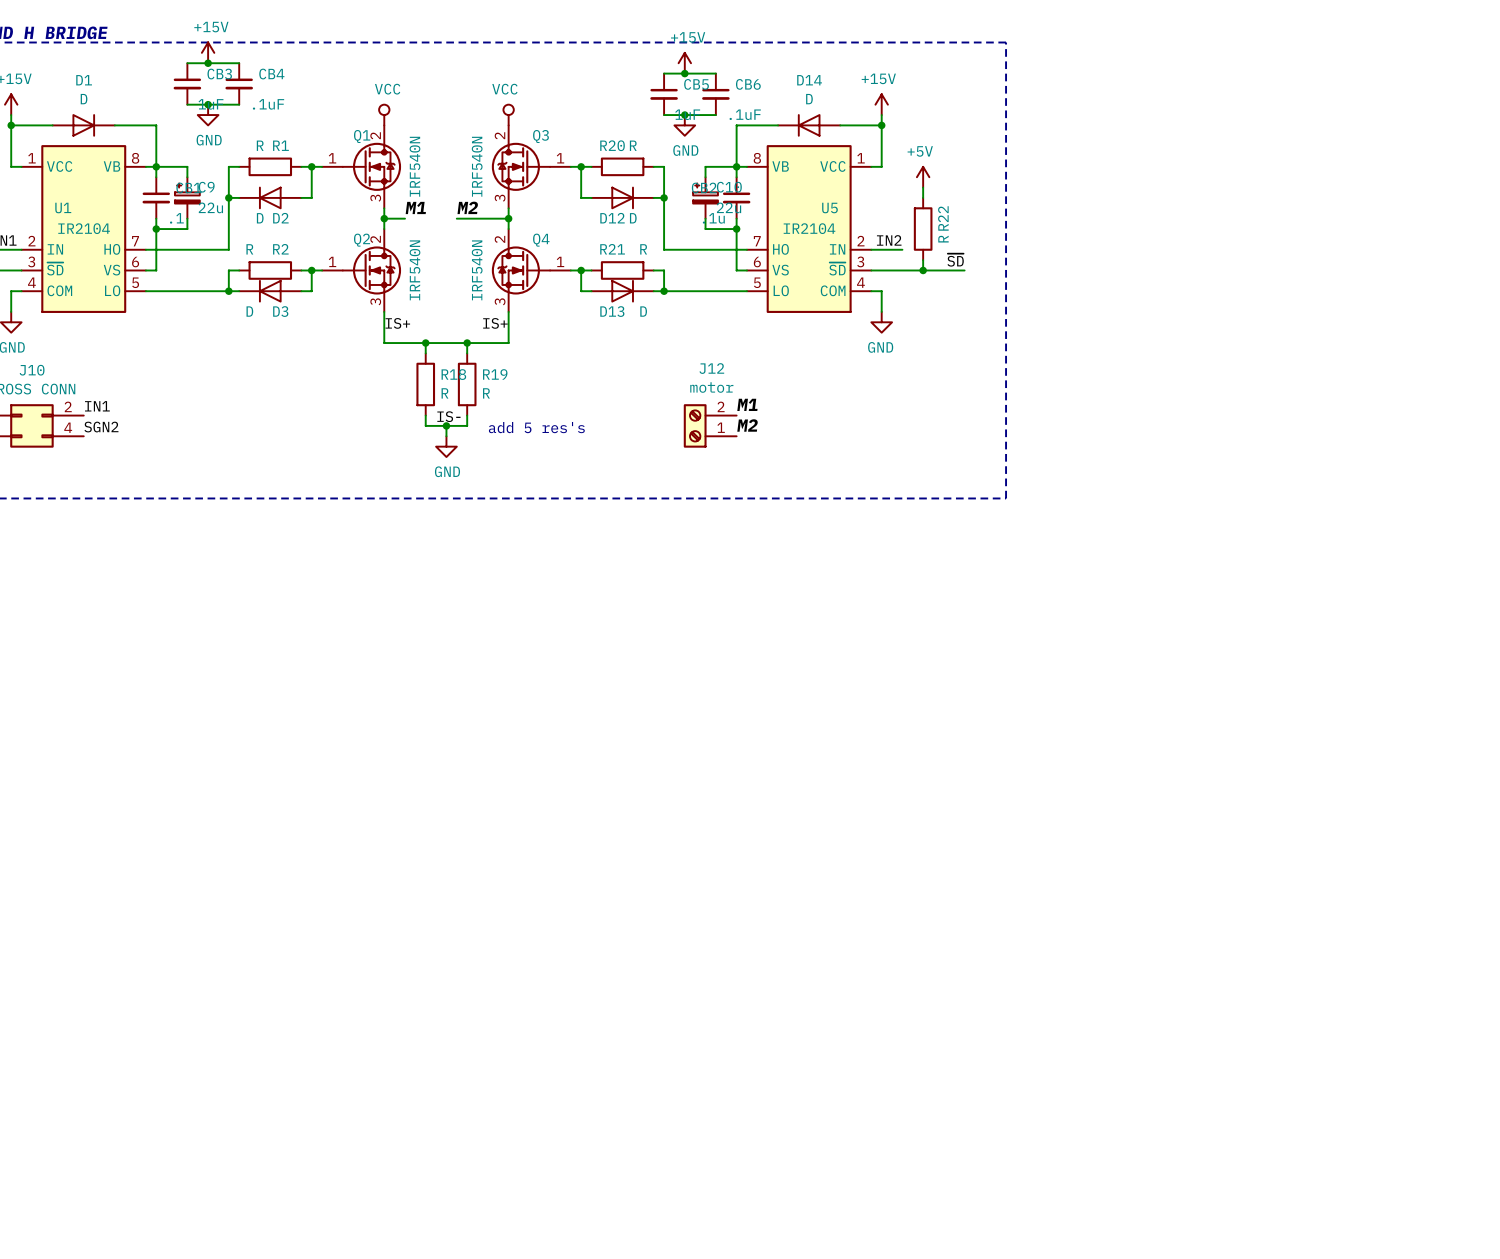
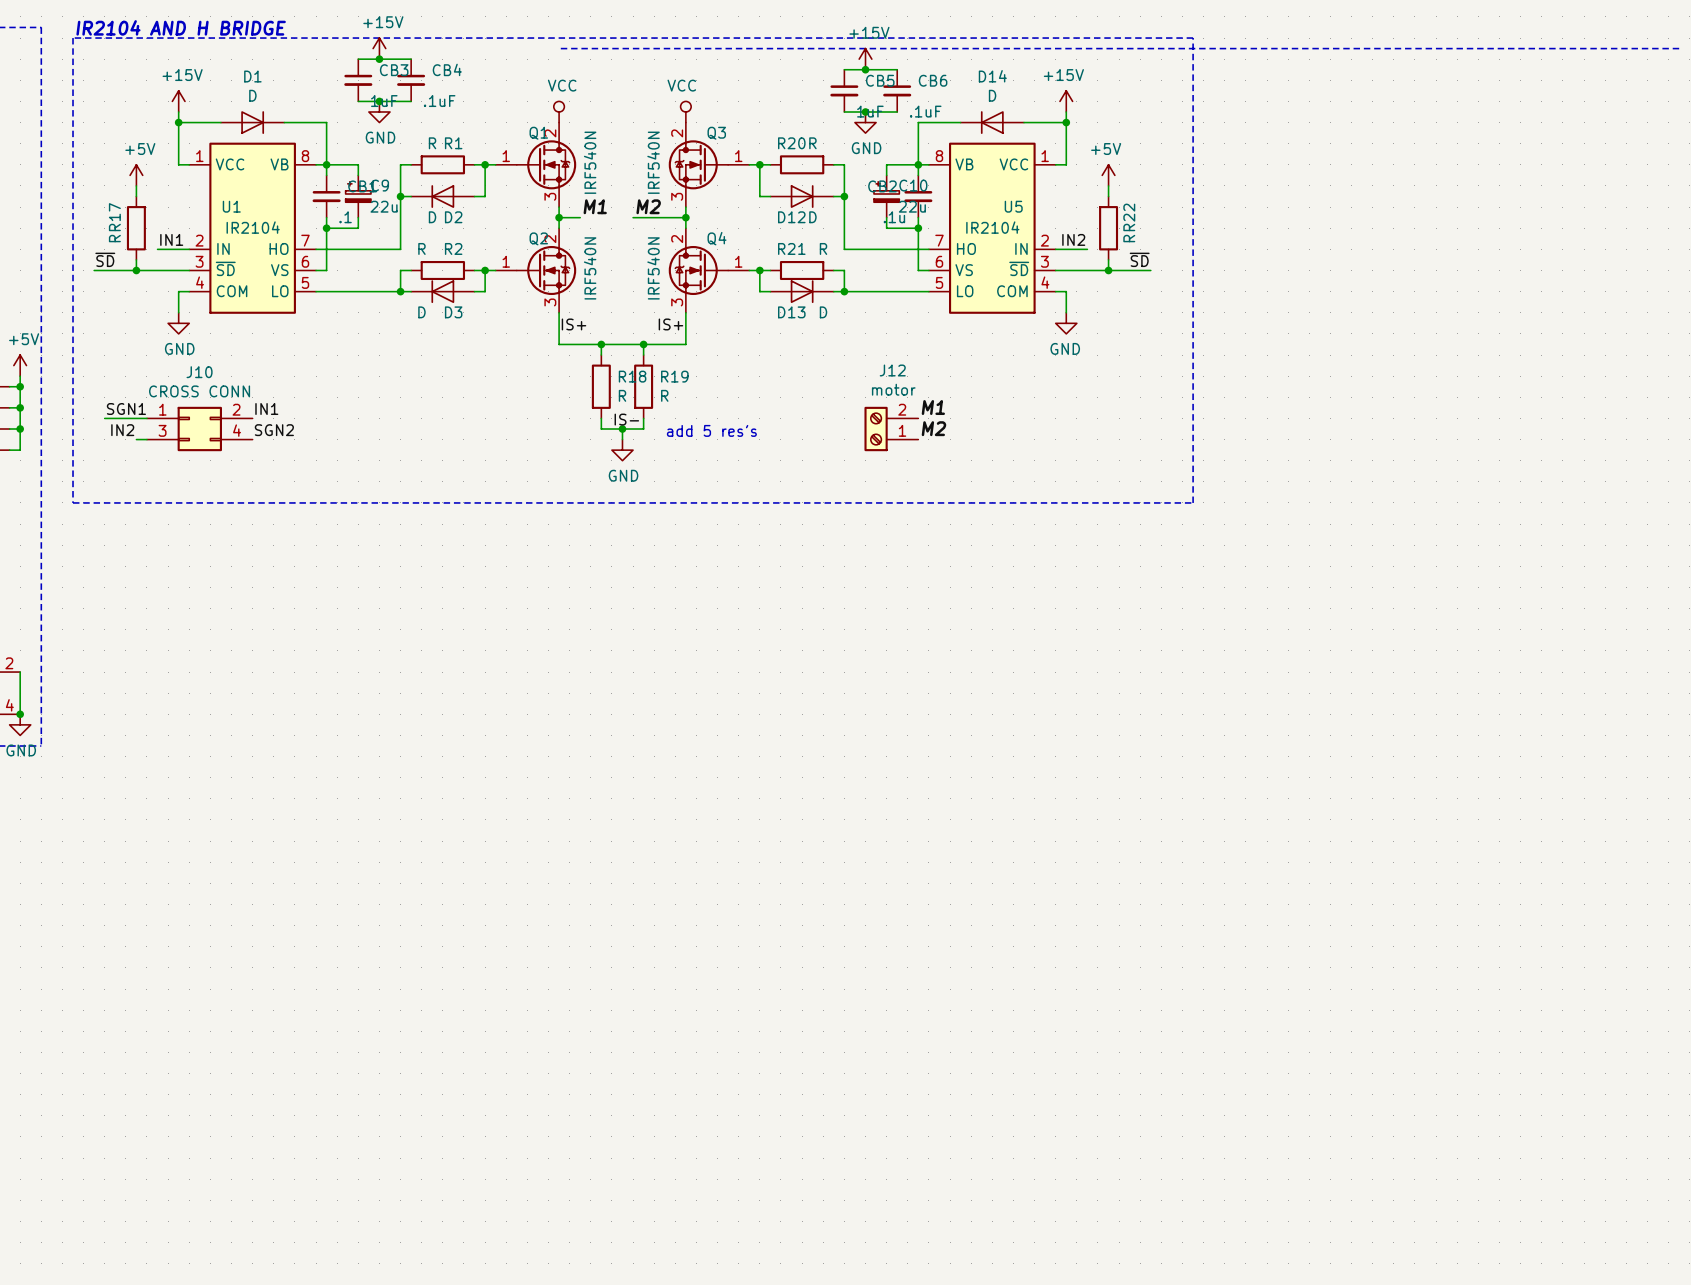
line: none -> (559, 48) (1679, 48)

